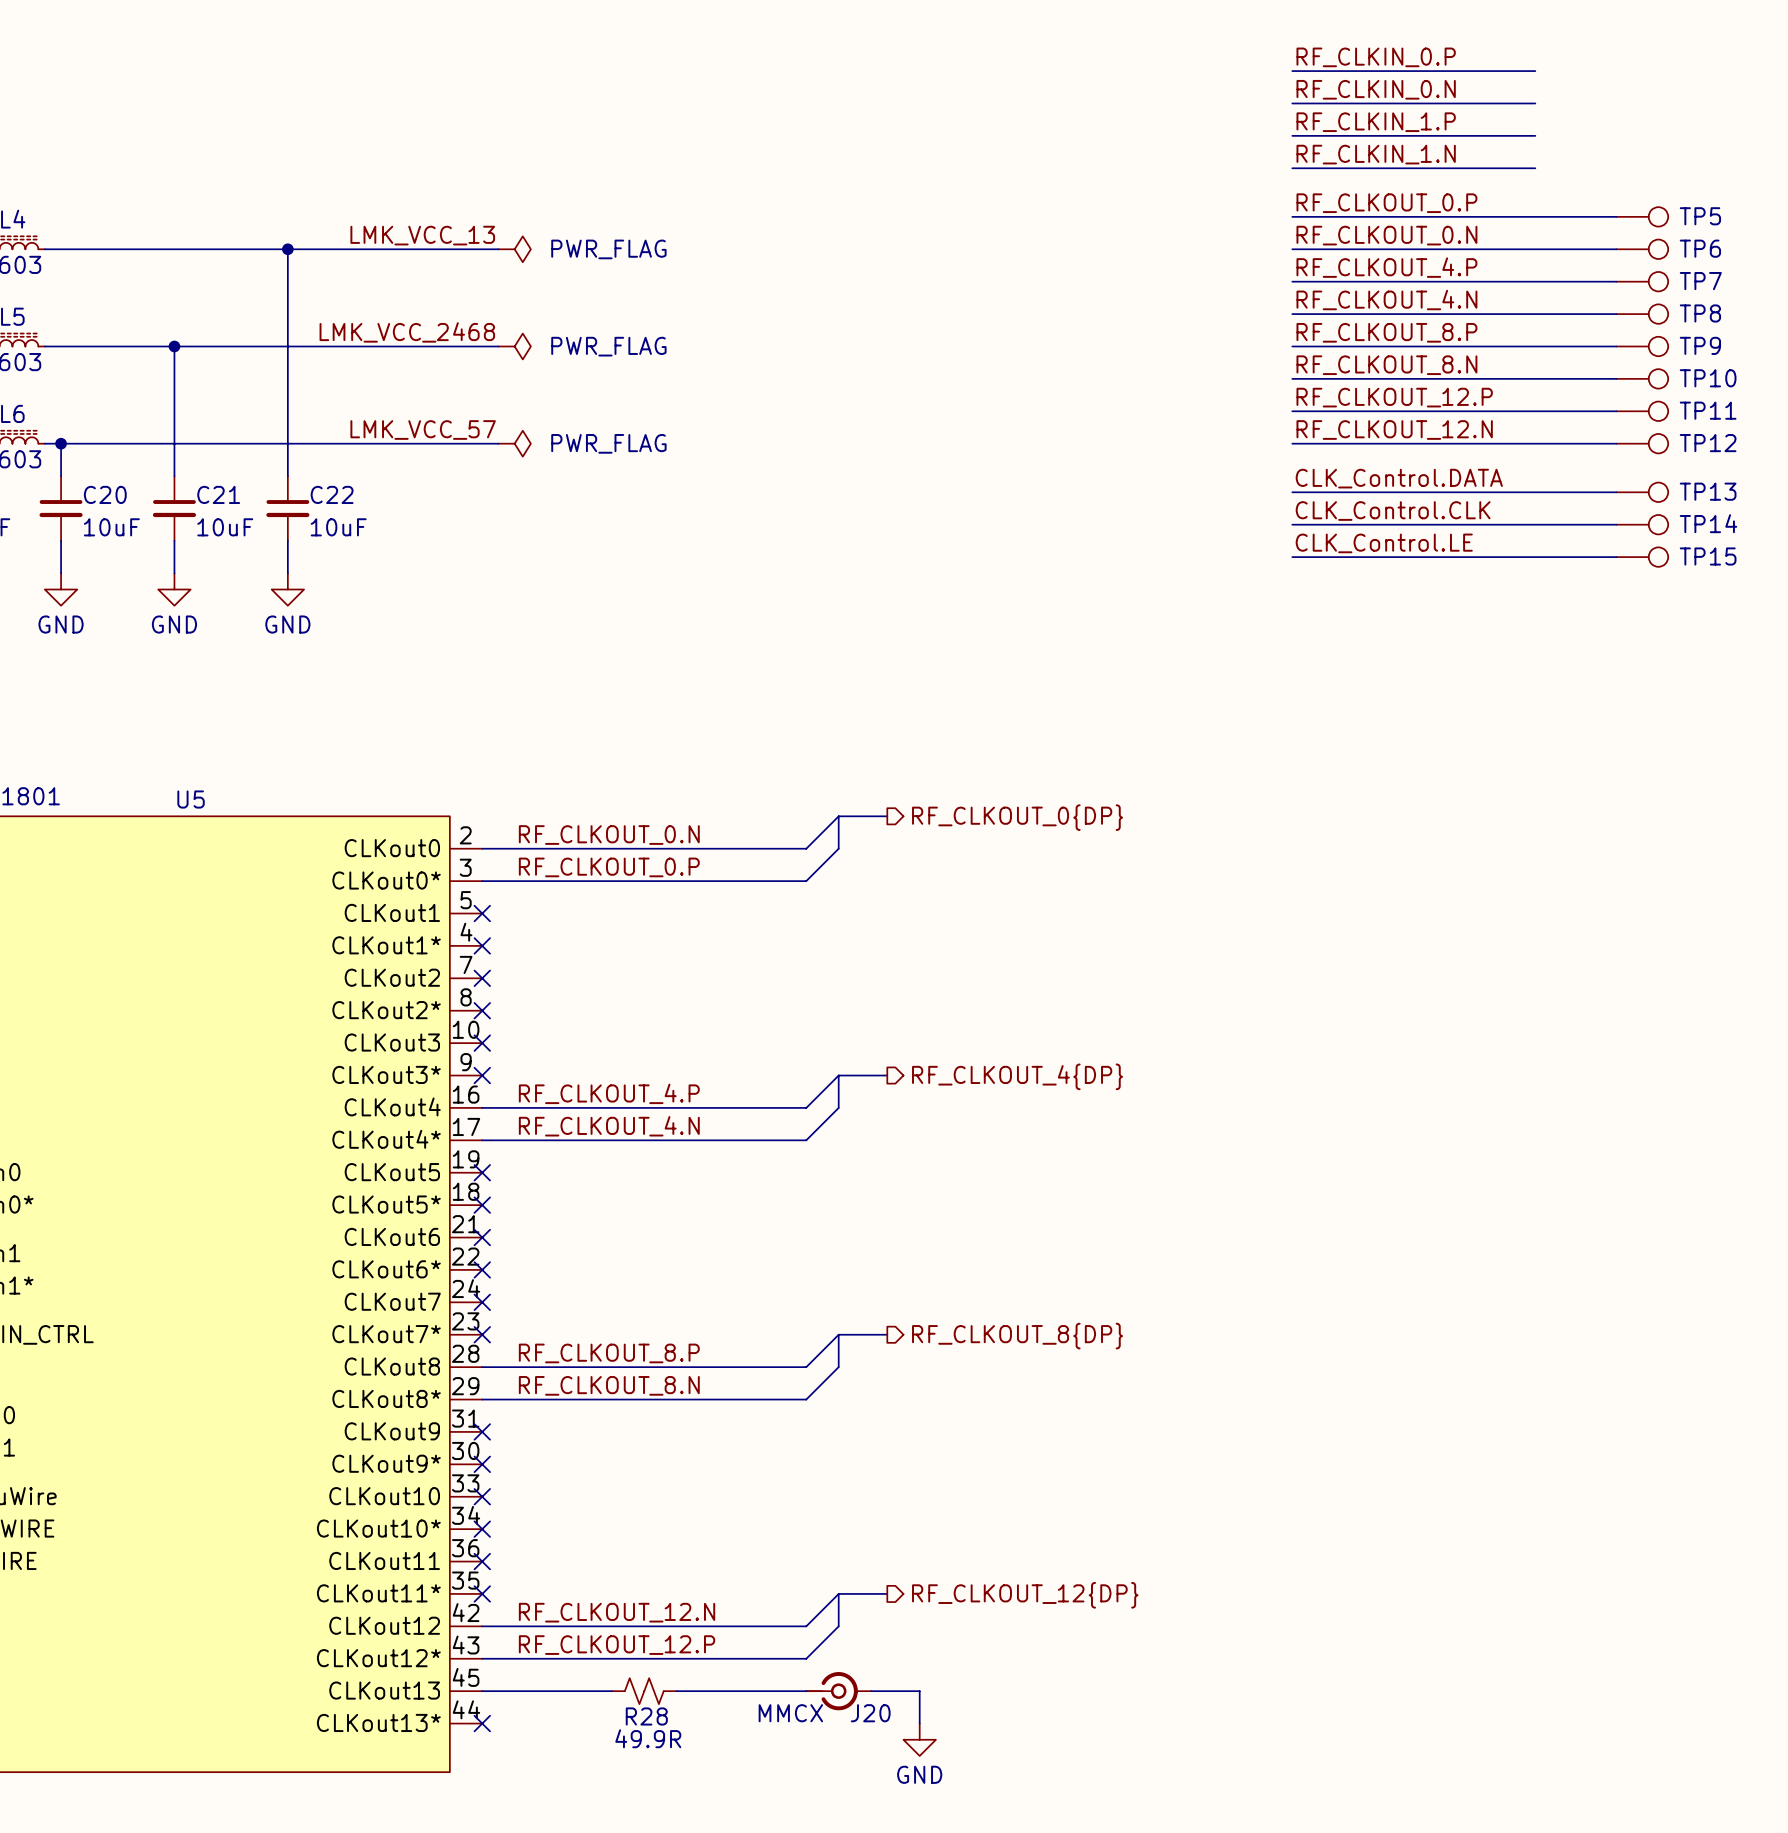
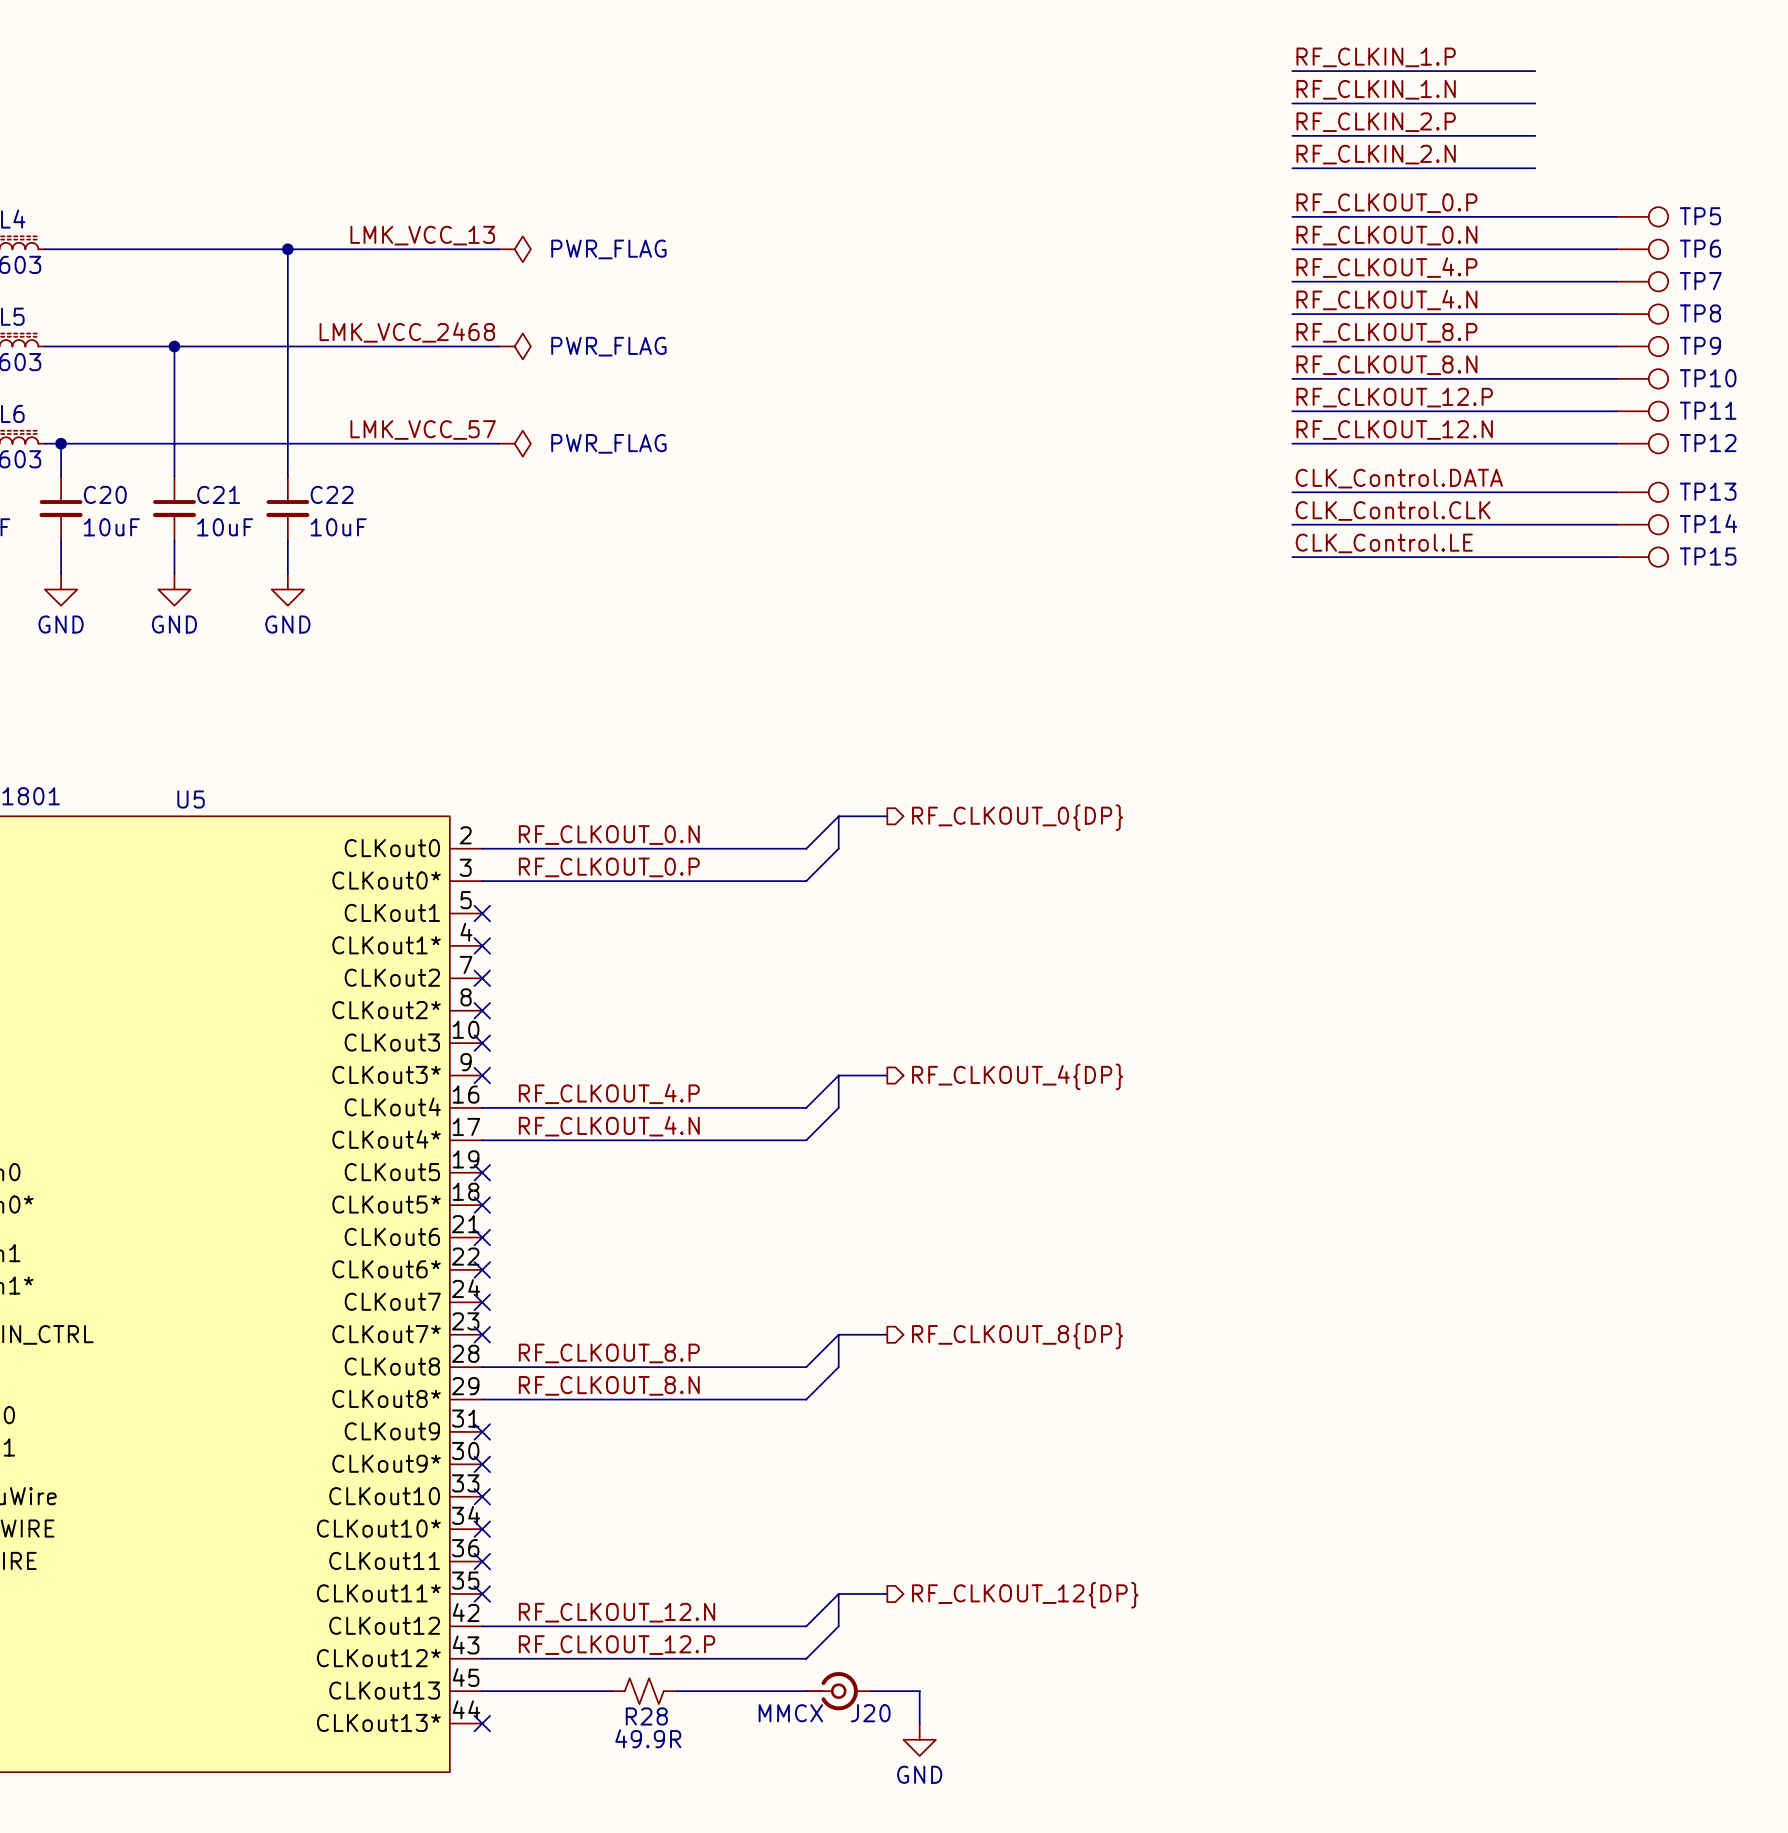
label: RF_CLKIN_0.P (1376, 57) -> RF_CLKIN_1.P (1376, 57)
label: RF_CLKIN_0.N (1376, 89) -> RF_CLKIN_1.N (1376, 89)
label: RF_CLKIN_1.P (1376, 122) -> RF_CLKIN_2.P (1376, 122)
label: RF_CLKIN_1.N (1376, 154) -> RF_CLKIN_2.N (1376, 154)

